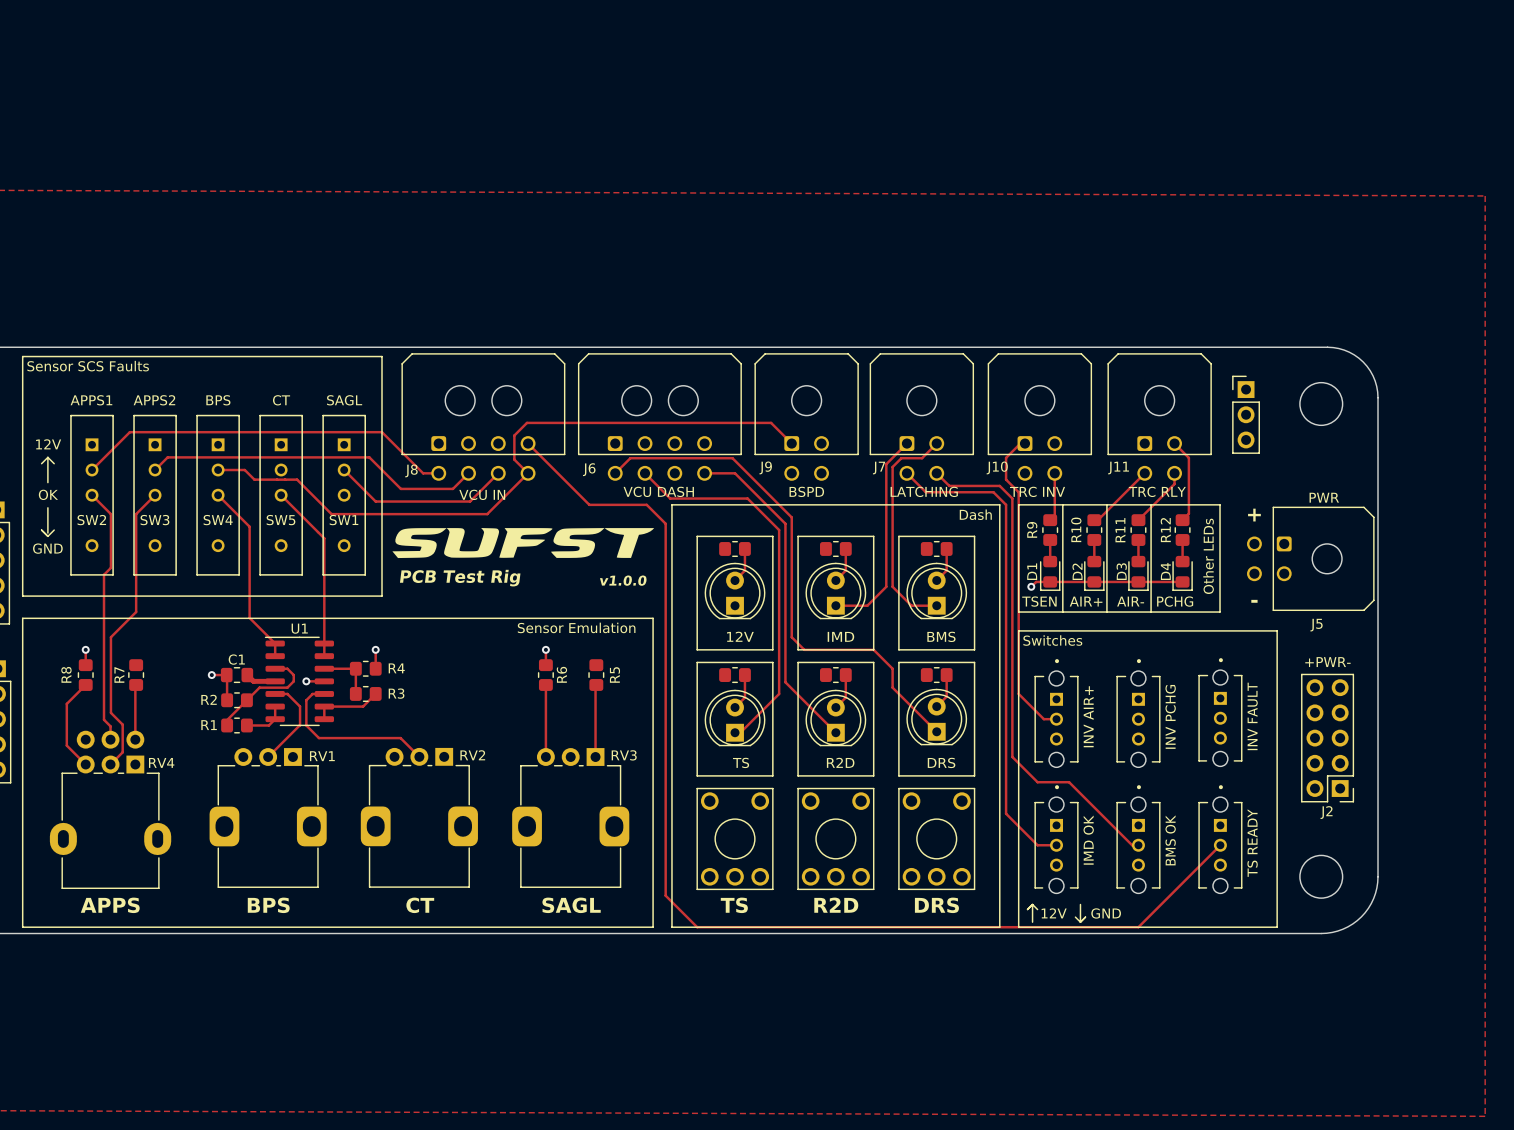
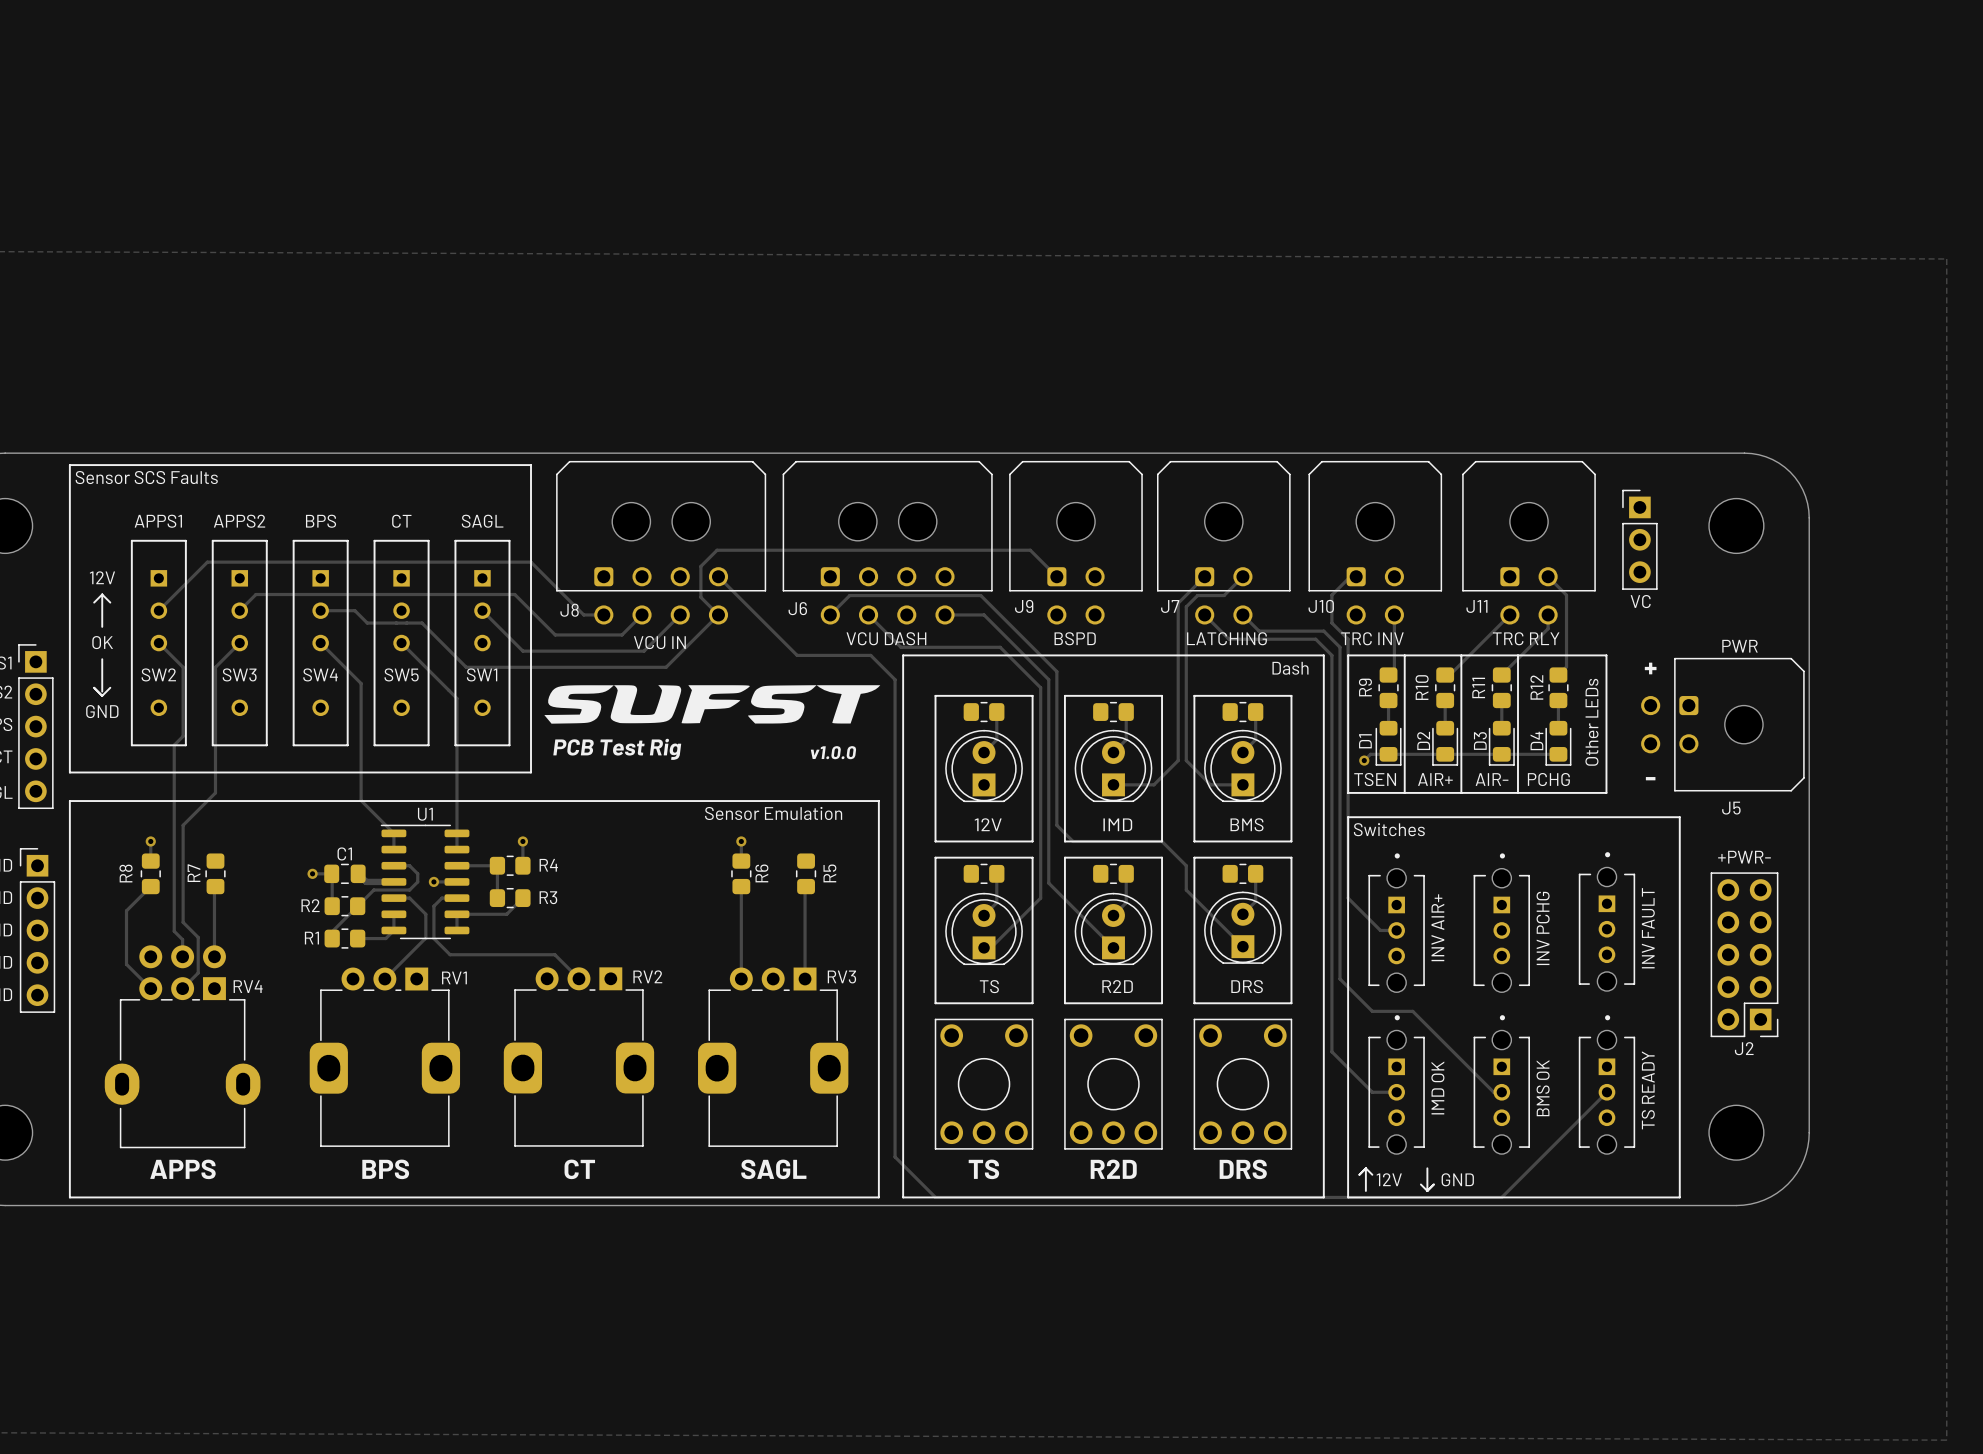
text: none -> VC (1640, 601)

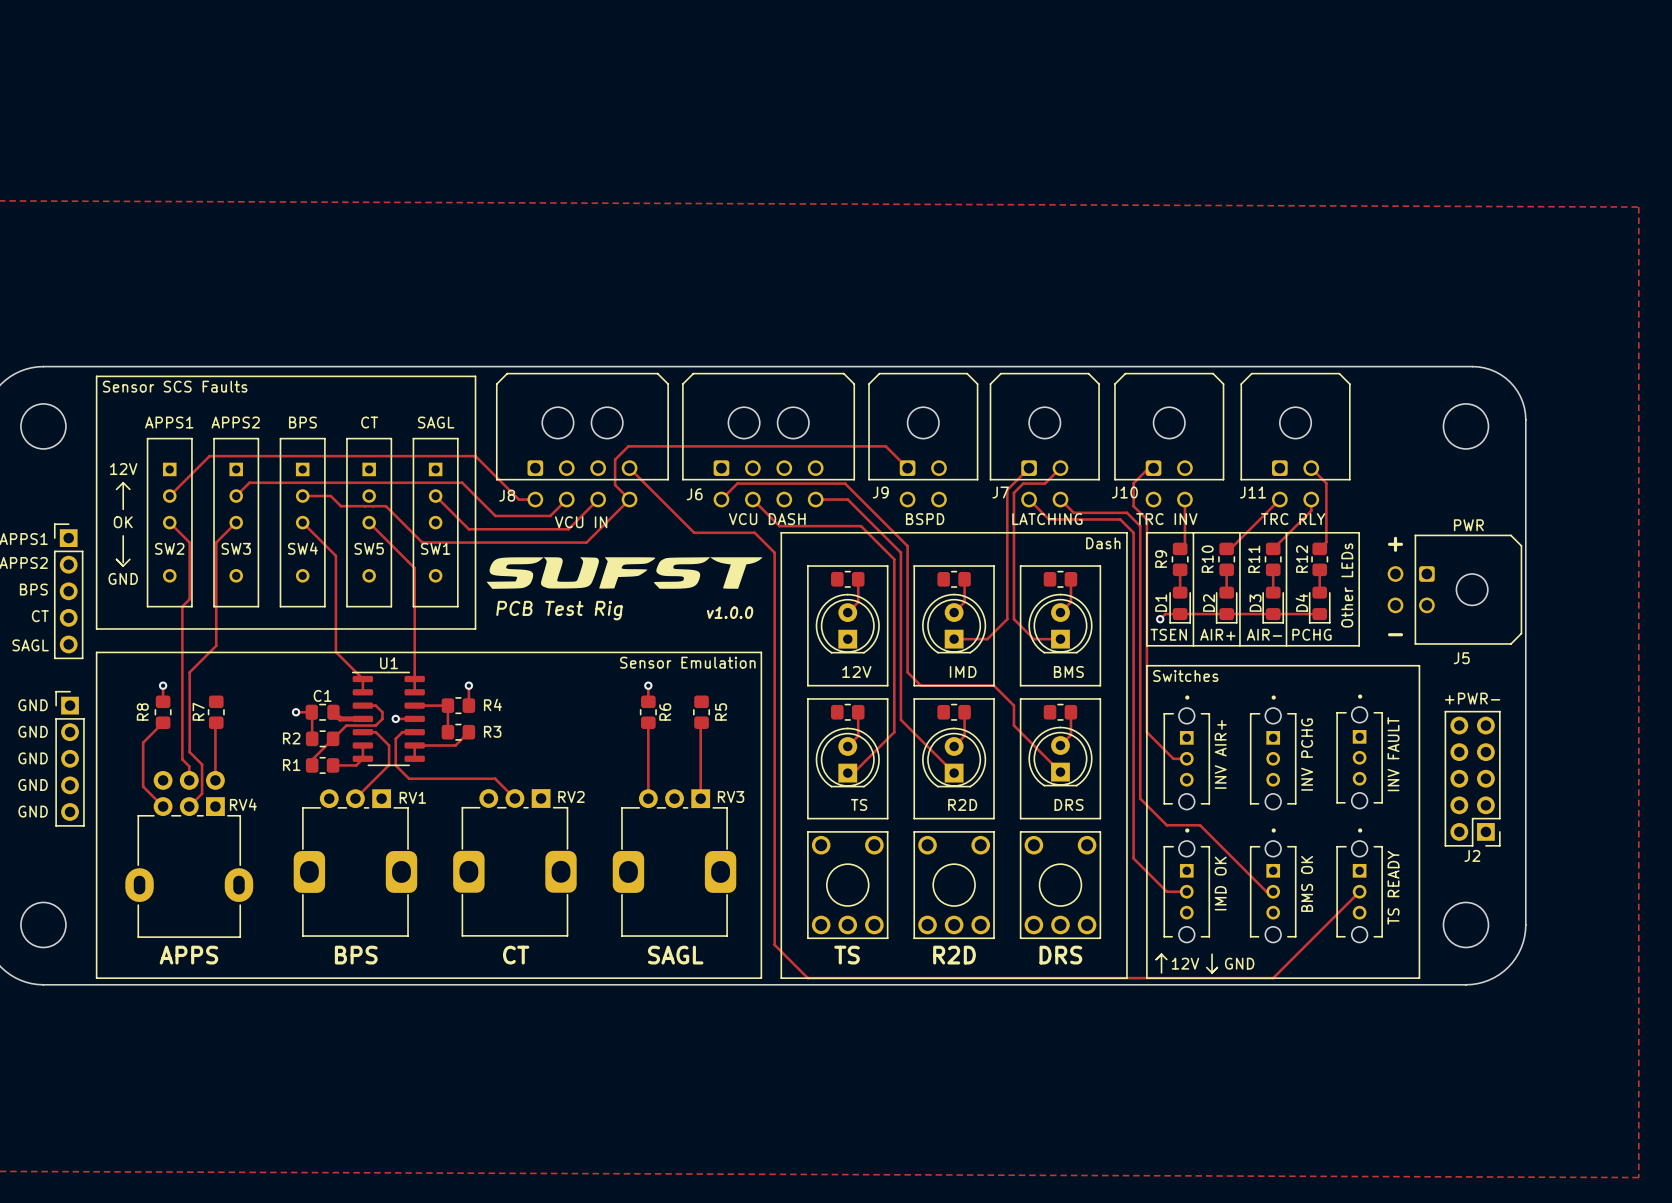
part: (1639, 539) -> none
text: VC (1640, 601) -> none

